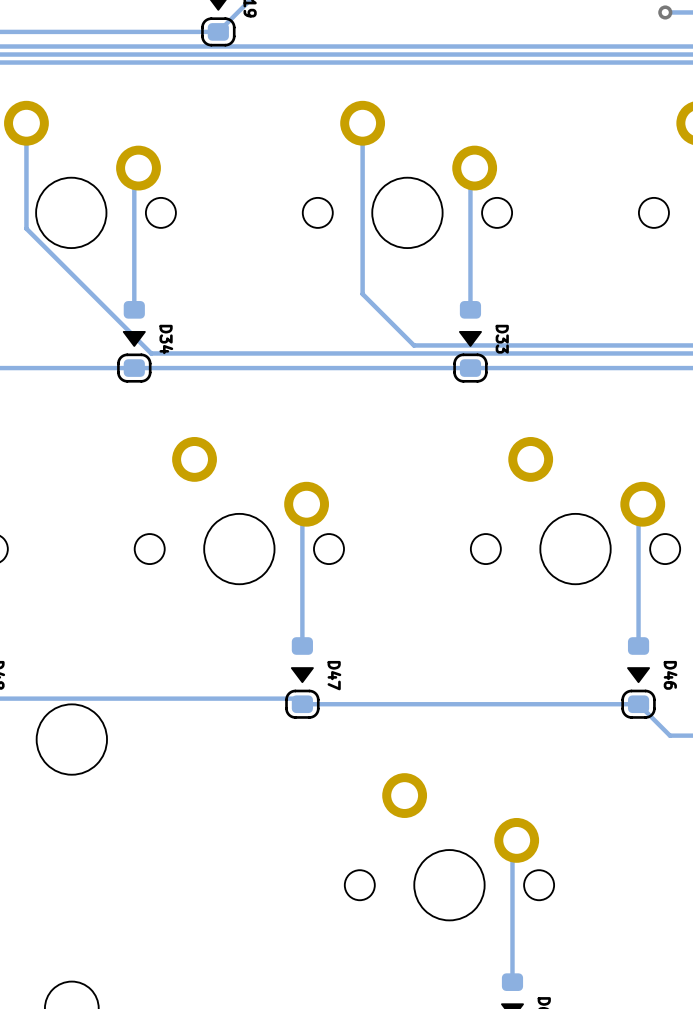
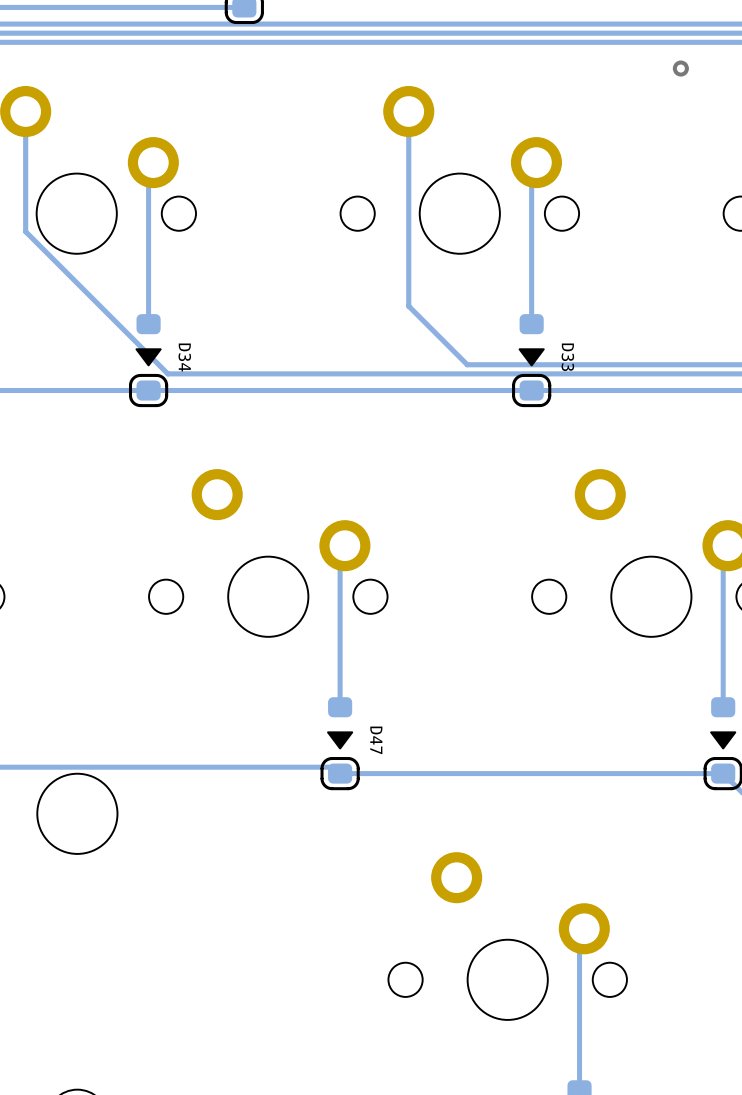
via: none -> (680, 68)

